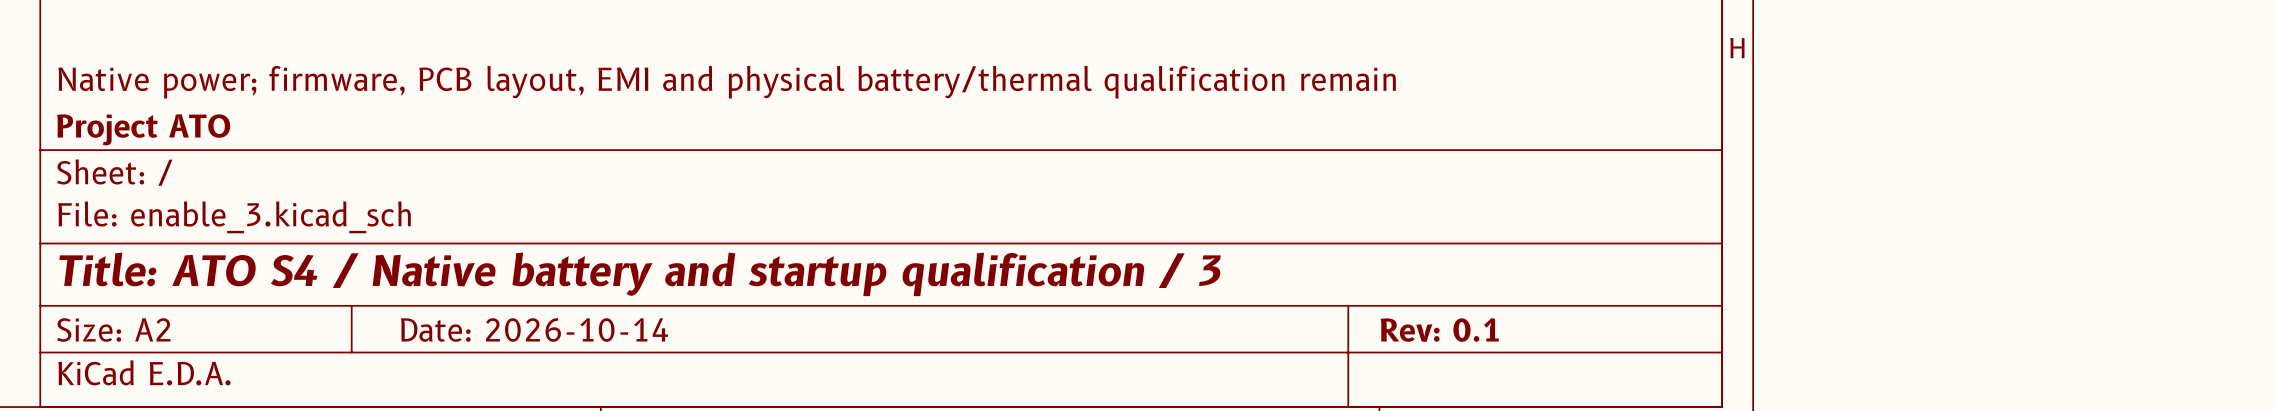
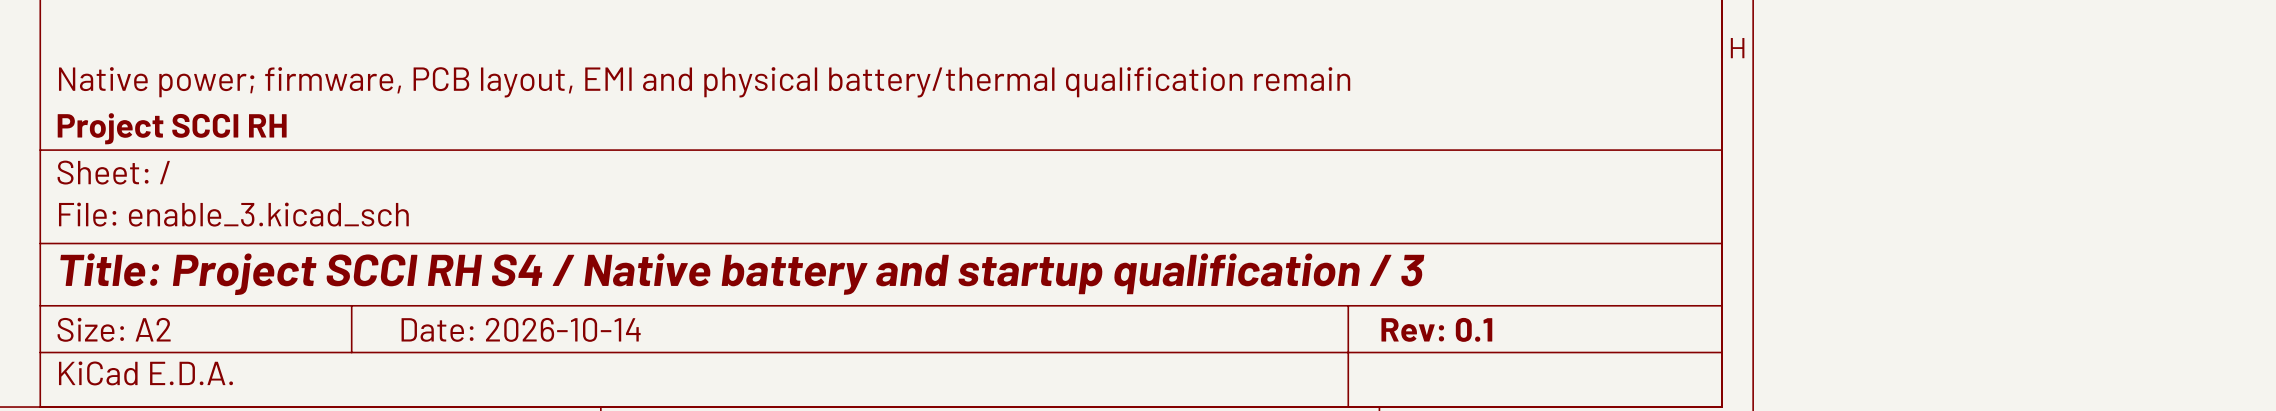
title block: Project ATO (143, 129) -> Project SCCI RH (172, 128)
title block: Title: ATO S4 / Native battery and startup qualification / 3 (640, 274) -> Title: Project SCCI RH S4 / Native battery and startup qualification / 3 (742, 274)

